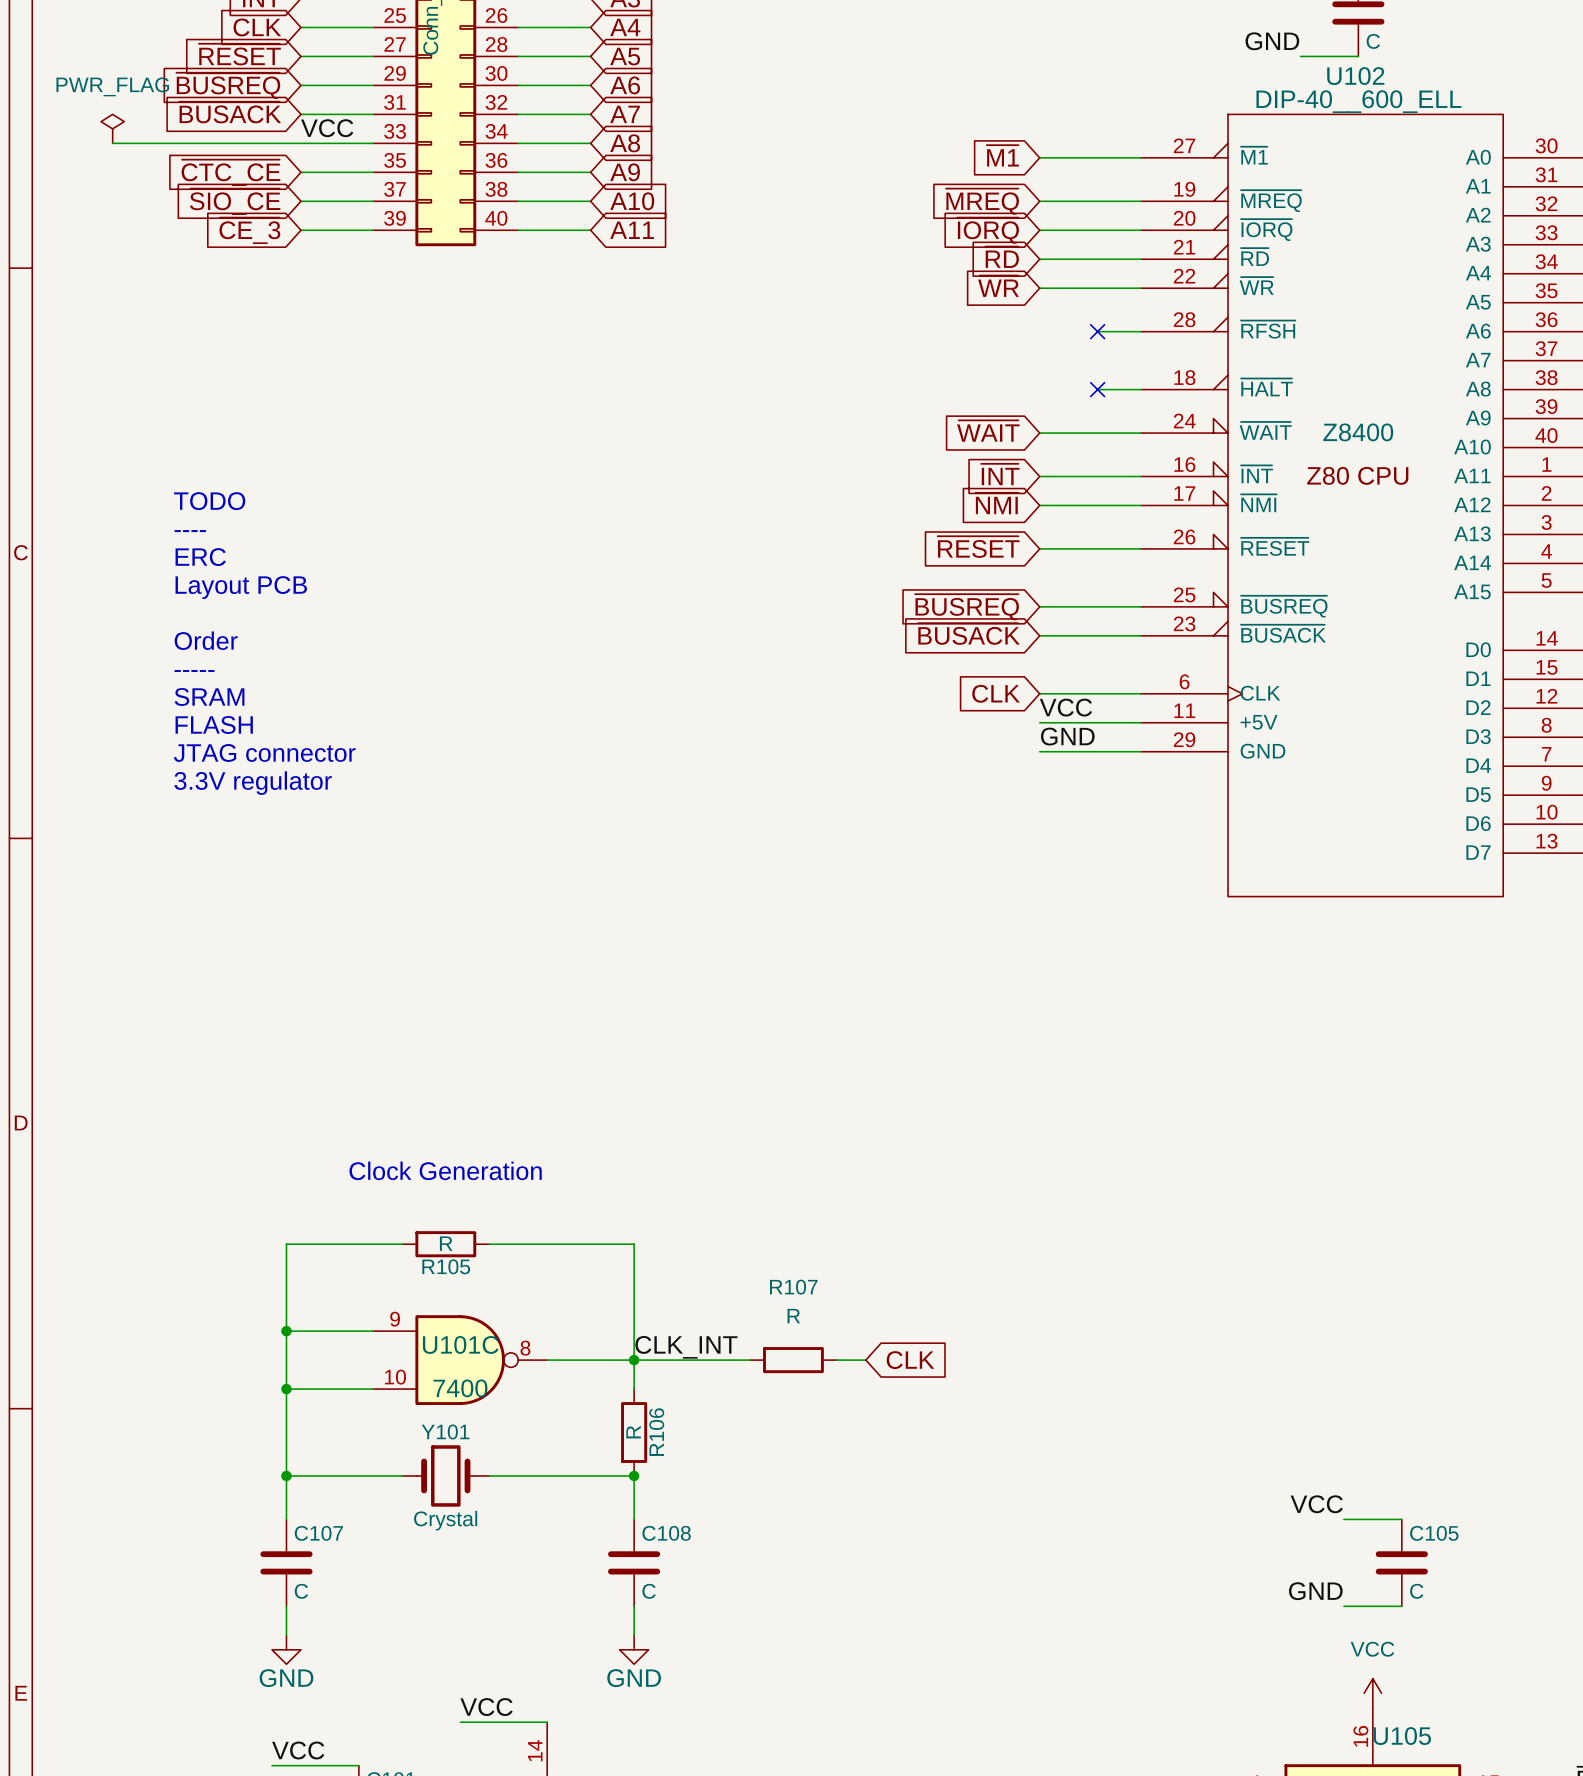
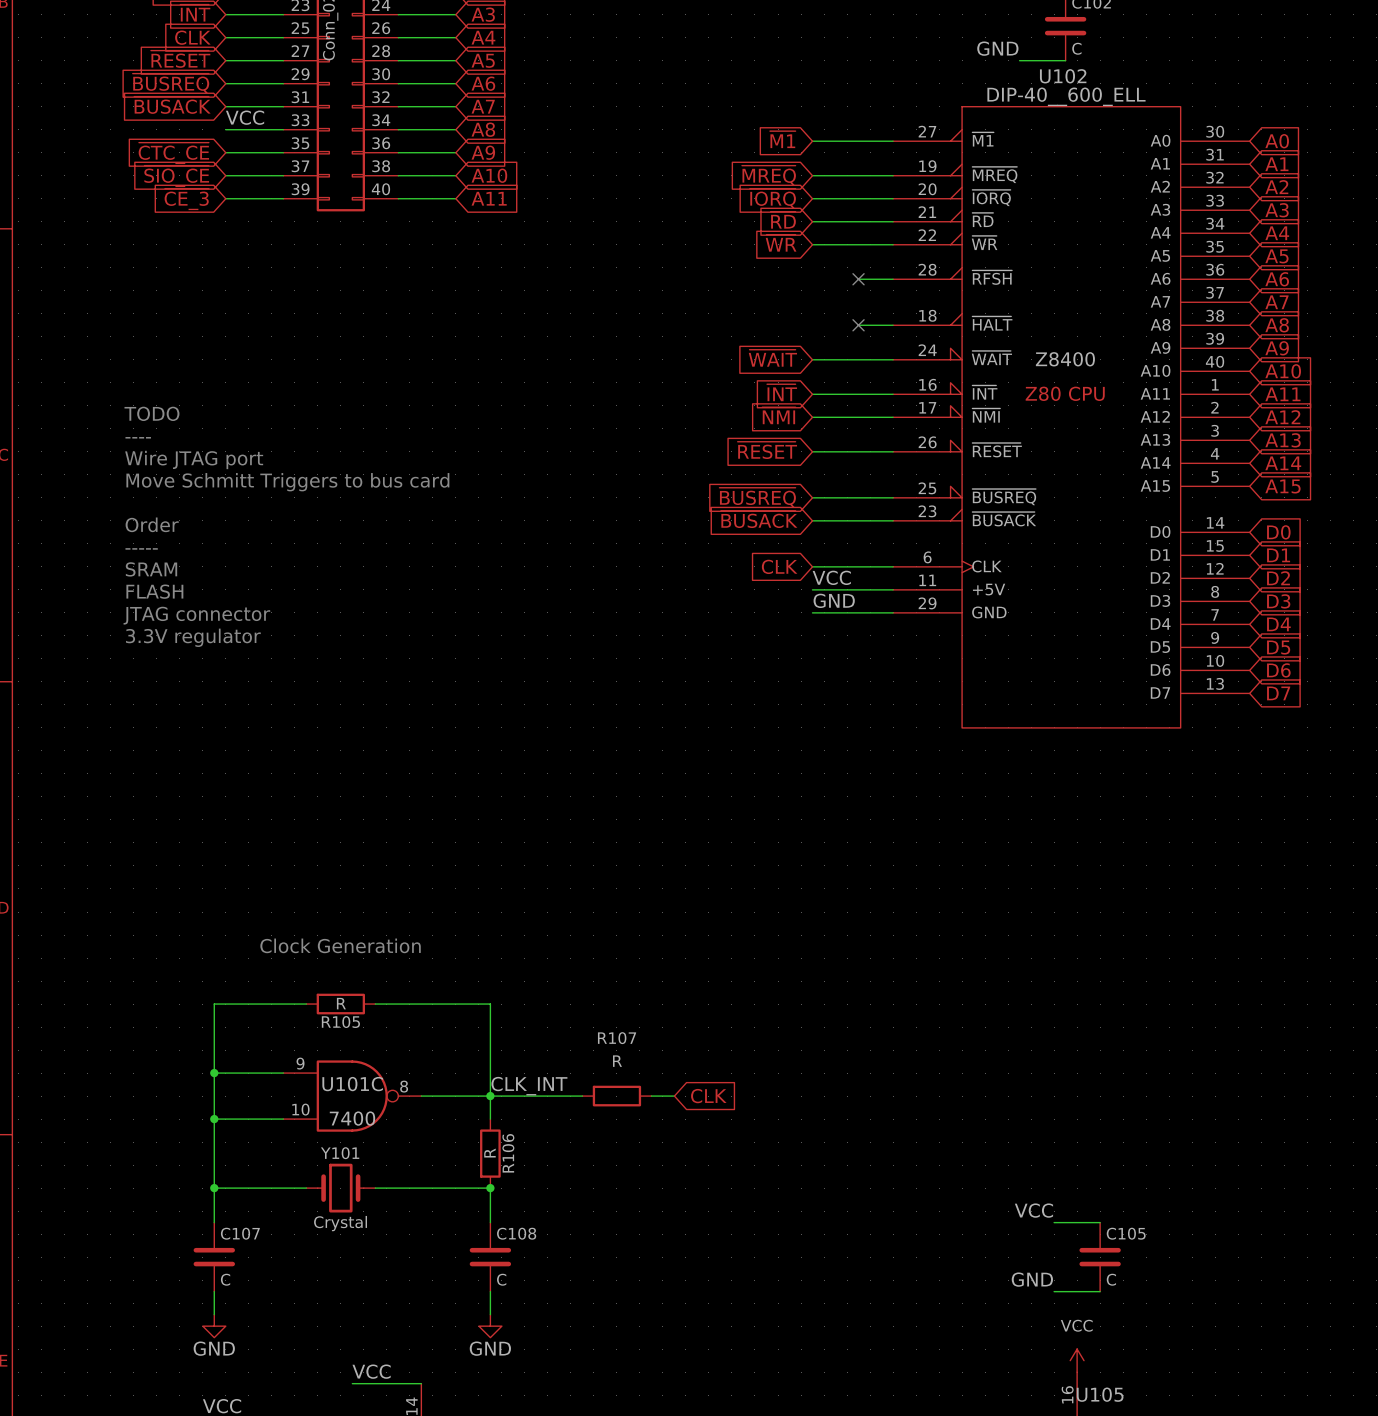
power symbol: PWR_FLAG (112, 128) -> none
wire: (112, 143) (300, 143) -> none
text: ERC (200, 557) -> Wire JTAG port (194, 459)
text: Layout PCB (241, 587) -> Move Schmitt Triggers to bus card (287, 482)

